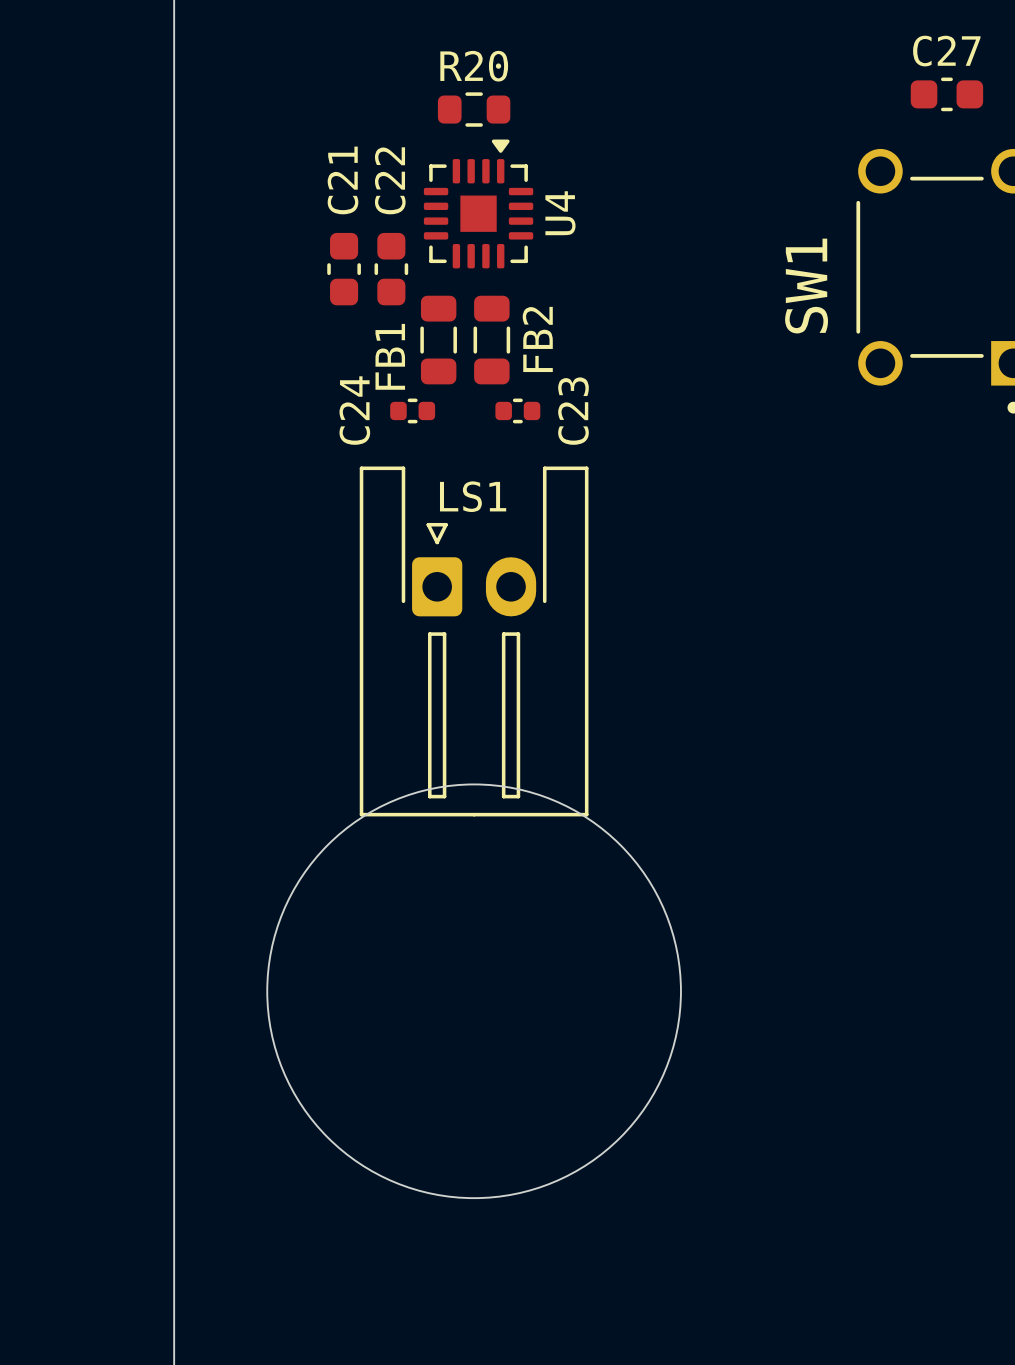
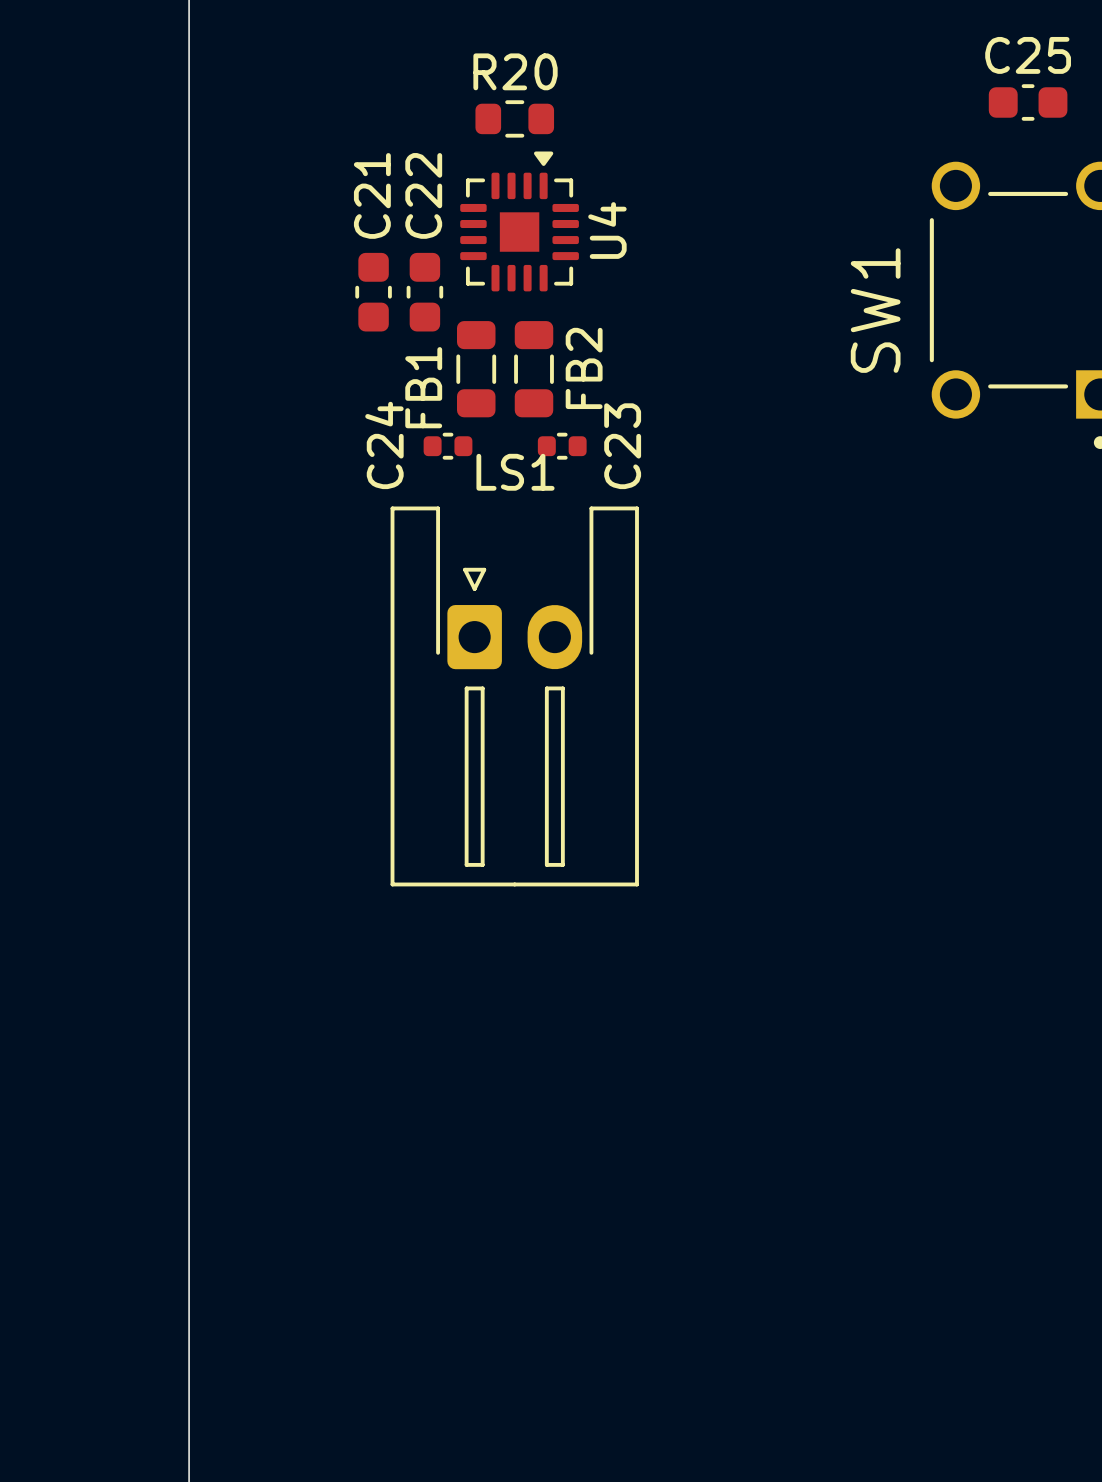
C27 name: C27 (946, 51) -> C25 (1028, 55)
LS1 name position: LS1 (473, 496) -> LS1 (515, 472)
round board edge: [266, 783, 682, 1199] -> none

